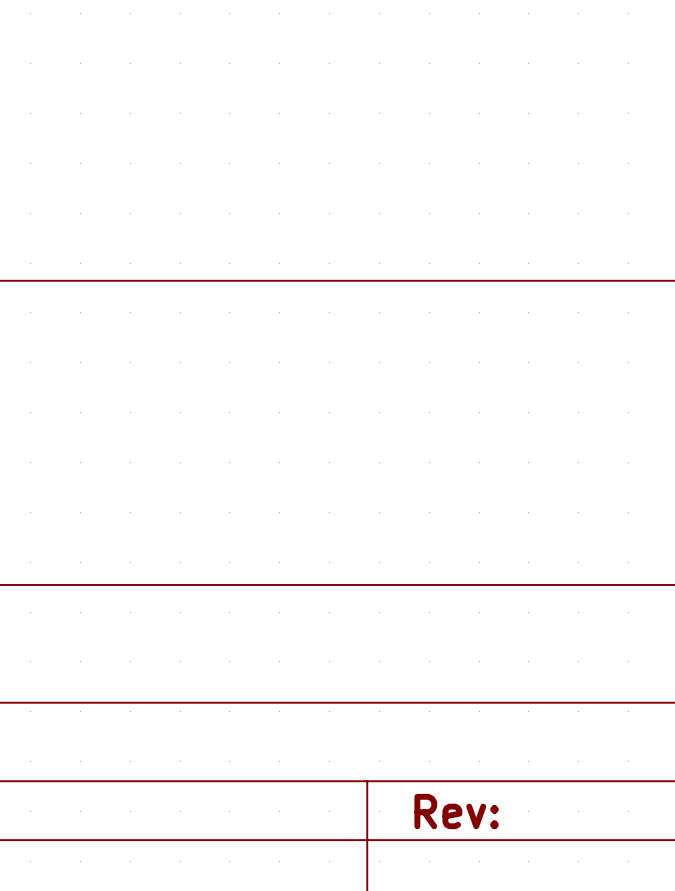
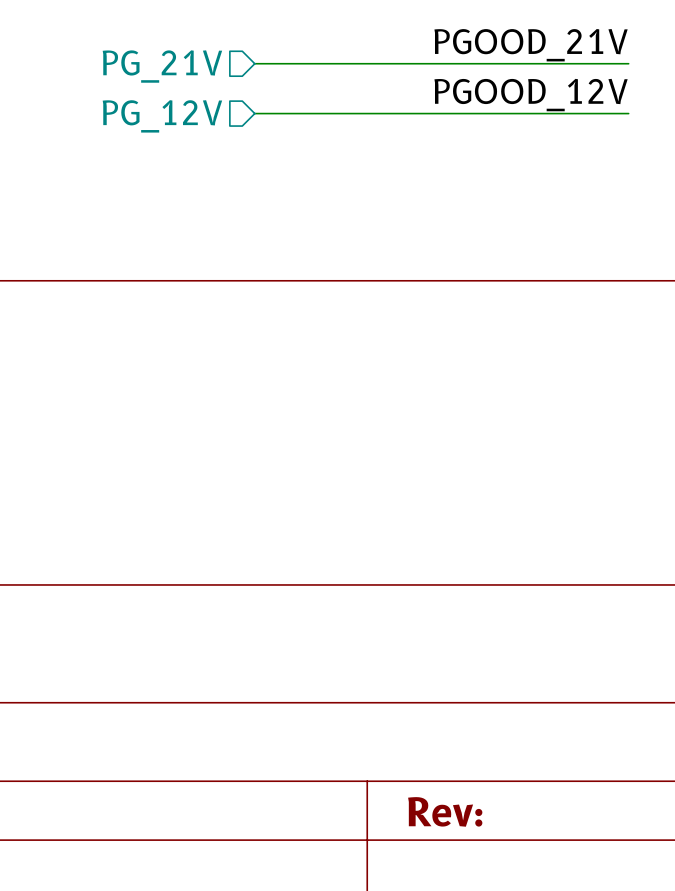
label: none -> PGOOD_21V (531, 45)
sheet pin: none -> PG_21V (162, 66)
wire: none -> (254, 63) (628, 63)
label: none -> PGOOD_12V (531, 95)
sheet pin: none -> PG_12V (162, 116)
wire: none -> (254, 113) (628, 113)

